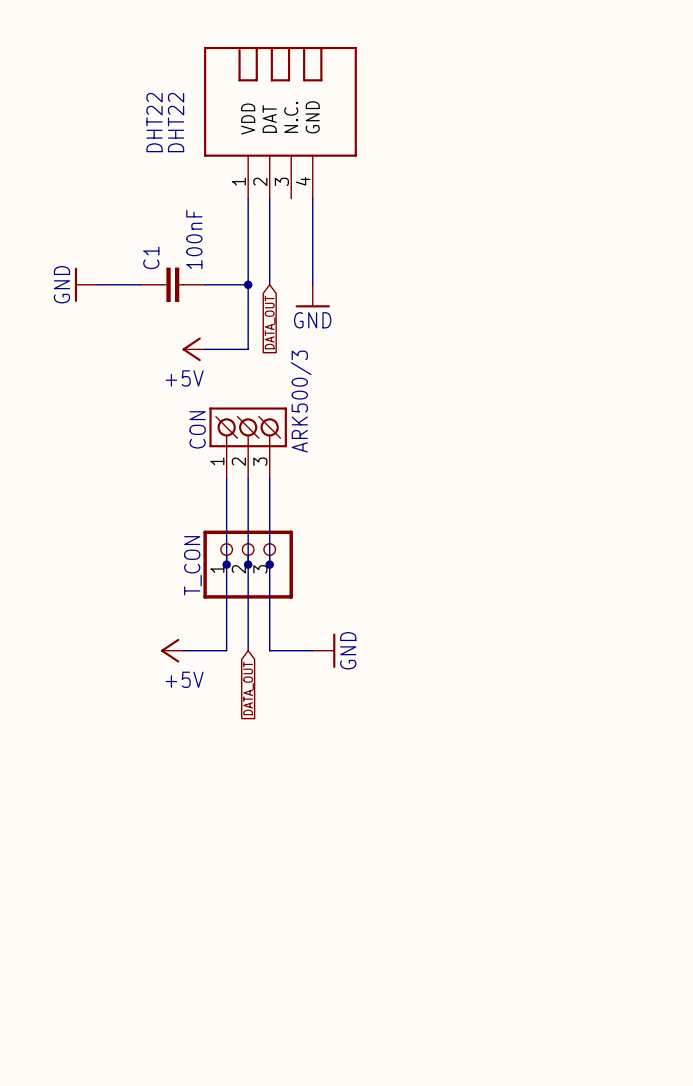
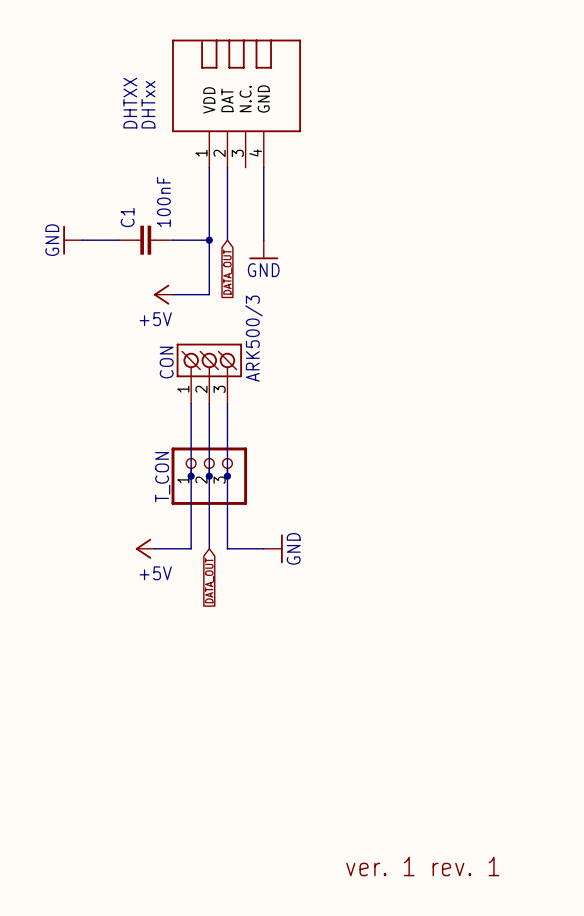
DHT22 name: DHT22 (154, 122) -> DHTXX (130, 103)
DHT22 value: DHT22 (176, 122) -> DHTxx (148, 104)
text: none -> ver. 1 rev. 1 (422, 866)

